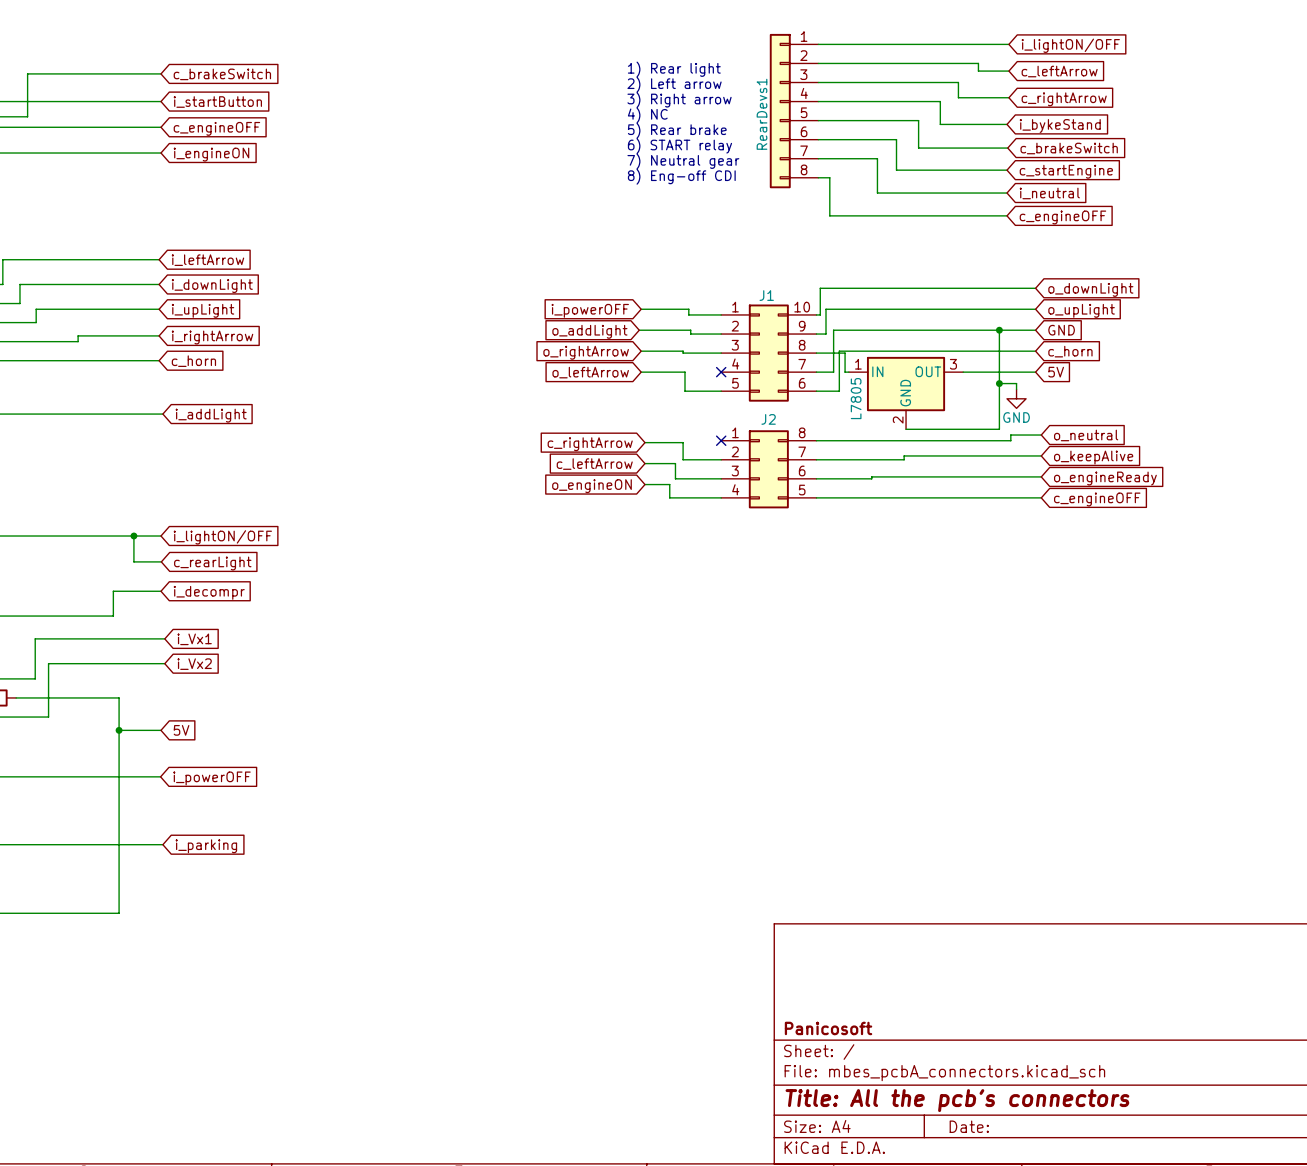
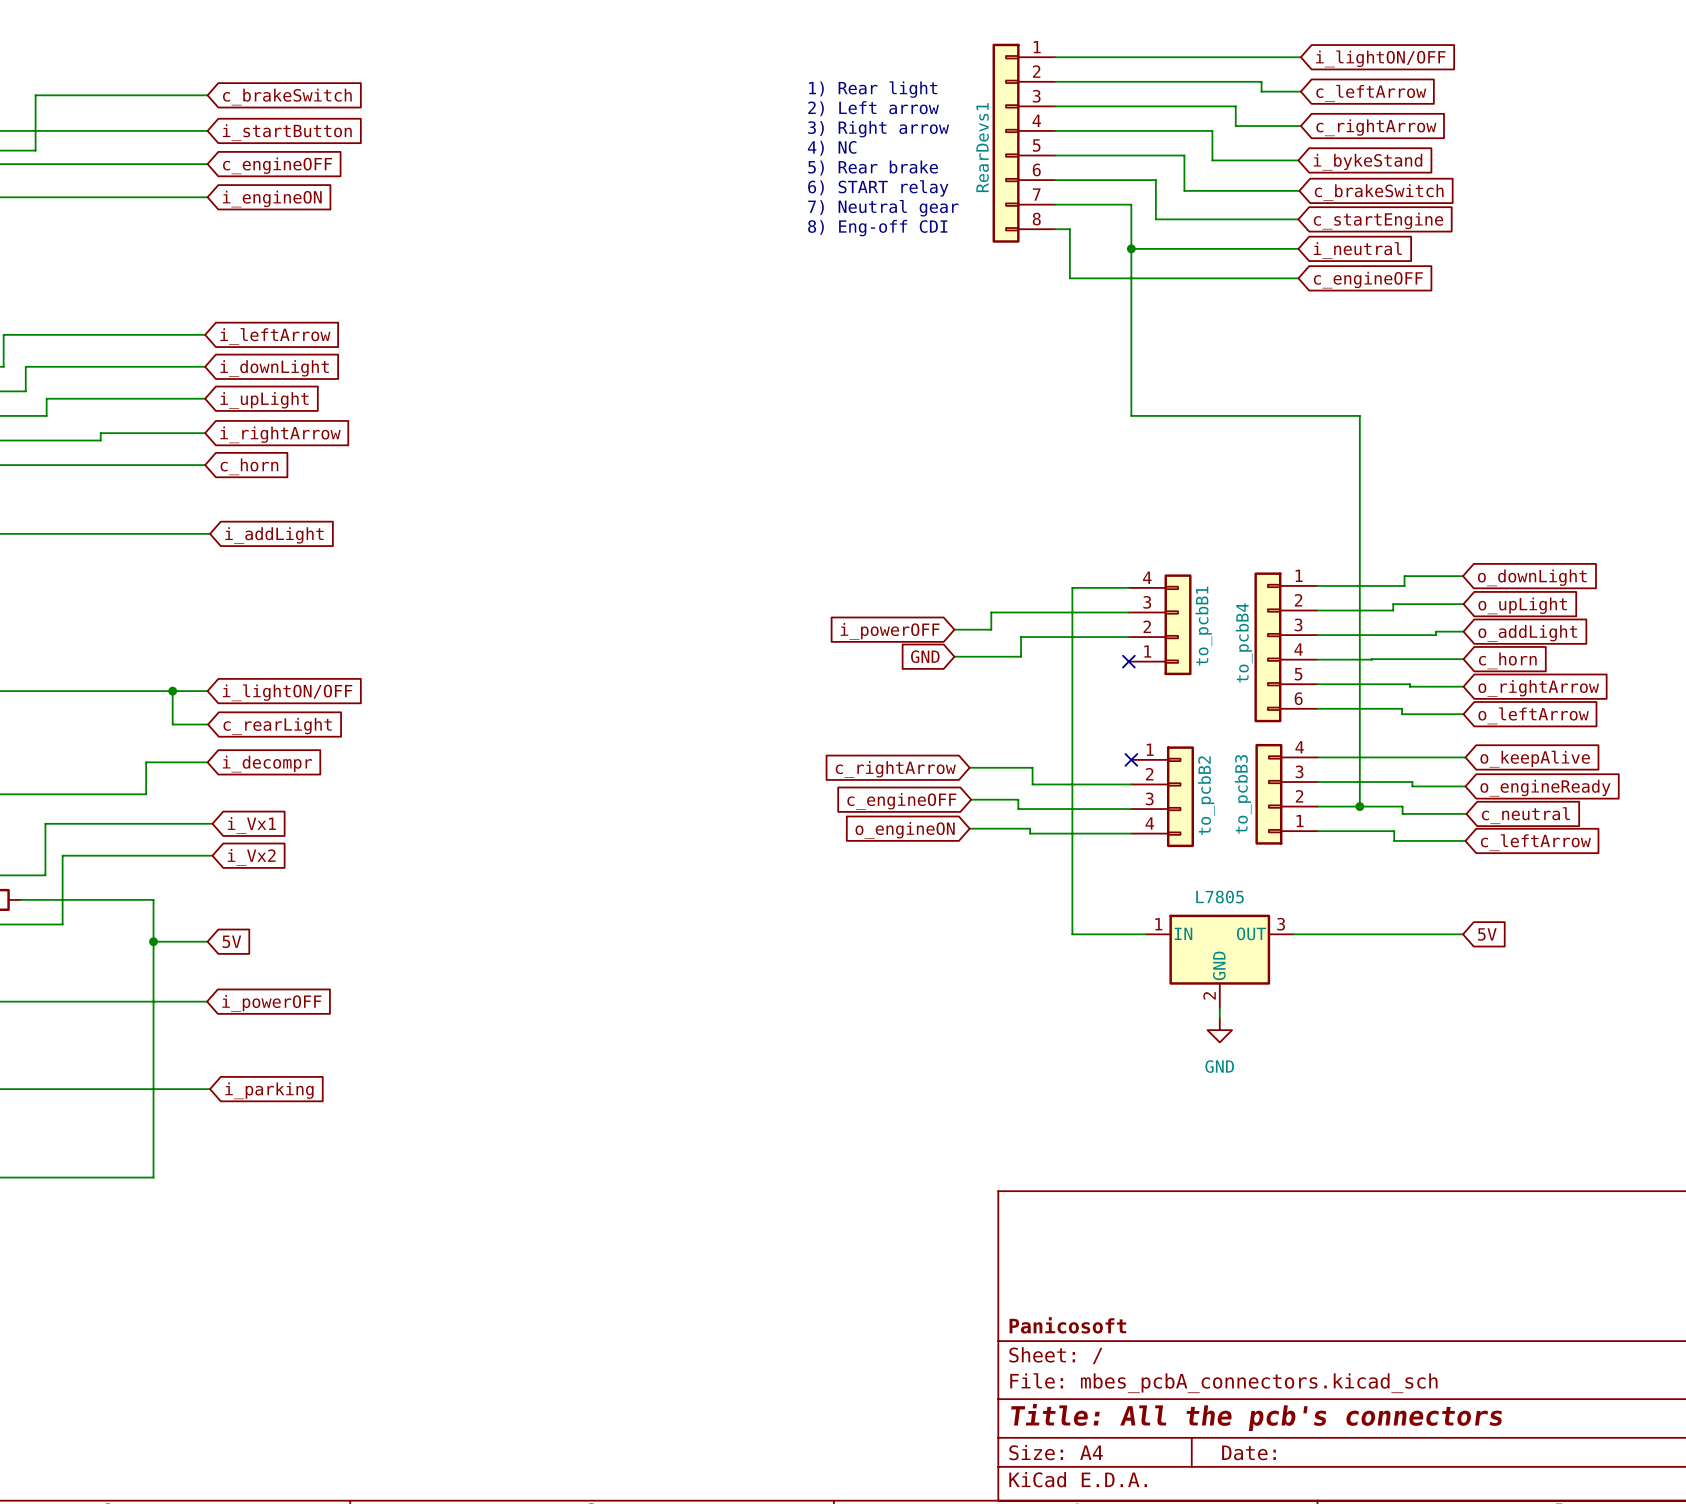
wire: none -> (1131, 248) (1131, 415) (1359, 415) (1359, 806)
junction: none -> (1131, 248)
wire: (1035, 288) (820, 288) (820, 314) (816, 314) -> none
global label position: o_downLight (1090, 289) -> o_downLight (1532, 577)
wire: (641, 309) (688, 309) (688, 314) (721, 314) -> none
wire: (1035, 309) (826, 309) (826, 334) (816, 334) -> none
global label: i_powerOFF (590, 310) -> none
global label: o_upLight (1081, 310) -> none
wire: (639, 330) (690, 330) (690, 334) (721, 334) -> none
wire: (999, 330) (999, 429) (906, 429) -> none
junction: (999, 330) -> none
wire: (1035, 330) (833, 330) (833, 372) (816, 372) -> none
global label: GND (1061, 330) -> none
global label: o_addLight (589, 331) -> none
wire: (641, 351) (721, 353) -> none
wire: (1035, 351) (839, 351) (839, 391) (816, 391) -> none
global label: c_horn (1070, 351) -> none
global label: o_rightArrow (586, 352) -> none
J1: (768, 353) -> none
wire: (816, 353) (845, 353) (845, 372) (848, 372) -> none
global label: o_leftArrow (590, 372) -> none
wire: (641, 372) (684, 372) (684, 391) (721, 391) -> none
no-connect mark: (721, 372) -> none
wire: (963, 372) (1035, 372) -> none
global label: 5V (1056, 372) -> none
wire: (999, 383) (1016, 383) (1016, 389) -> none
junction: (999, 383) -> none
part: L7805 (906, 393) -> none
power symbol: GND (1016, 398) -> none
wire: (1041, 435) (1010, 435) (1010, 440) (816, 440) -> none
global label: o_neutral (1086, 435) -> none
no-connect mark: (721, 440) -> none
wire: (644, 442) (683, 442) (683, 459) (721, 459) -> none
global label position: c_rightArrow (590, 444) -> c_rightArrow (895, 769)
wire: none -> (1463, 576) (1404, 576) (1404, 585) (1317, 585)
wire: none -> (1128, 587) (1072, 587) (1072, 934) (1146, 934)
wire: (1041, 455) (904, 455) (904, 459) (816, 459) -> none
global label position: o_keepAlive (1093, 457) -> o_keepAlive (1535, 759)
wire: (644, 463) (675, 463) (675, 478) (721, 478) -> none
global label: c_leftArrow (594, 464) -> none
wire: none -> (1463, 604) (1393, 604) (1393, 610) (1317, 610)
J2: (768, 469) -> none
global label: none -> o_upLight (1522, 605)
wire: none -> (1128, 612) (991, 612) (991, 629) (954, 629)
wire: (1041, 476) (816, 478) -> none
global label position: o_engineReady (1105, 478) -> o_engineReady (1545, 788)
wire: (644, 484) (669, 484) (669, 497) (721, 497) -> none
to_pcbB1: none -> (1160, 624)
global label: o_engineON (592, 486) -> none
global label: none -> i_powerOFF (890, 631)
wire: none -> (1463, 631) (1435, 631) (1435, 635) (1317, 635)
global label: none -> o_addLight (1527, 633)
wire: none -> (1128, 637) (1021, 637) (1021, 656) (954, 656)
wire: (816, 497) (1041, 497) -> none
global label: c_engineOFF (1097, 499) -> none
to_pcbB4: none -> (1285, 647)
global label: none -> GND (925, 656)
wire: none -> (1463, 659) (1317, 659)
global label: none -> c_horn (1507, 660)
no-connect mark: none -> (1128, 661)
wire: none -> (1317, 684) (1409, 684) (1409, 686) (1463, 686)
global label: none -> o_rightArrow (1538, 688)
wire: none -> (1317, 708) (1402, 708) (1402, 714) (1463, 714)
global label: none -> o_leftArrow (1533, 715)
wire: none -> (1318, 757) (1465, 757)
no-connect mark: none -> (1131, 759)
wire: none -> (969, 767) (1032, 767) (1032, 784) (1131, 784)
wire: none -> (1318, 782) (1412, 782) (1412, 786) (1465, 786)
to_pcbB3: none -> (1286, 794)
to_pcbB2: none -> (1162, 796)
wire: none -> (971, 799) (1018, 799) (1018, 809) (1131, 809)
global label: none -> c_engineOFF (901, 801)
wire: none -> (1318, 806) (1402, 806) (1402, 813) (1466, 813)
junction: none -> (1359, 806)
global label: none -> c_neutral (1525, 815)
wire: none -> (969, 828) (1030, 828) (1030, 833) (1131, 833)
global label: none -> o_engineON (905, 830)
wire: none -> (1318, 831) (1394, 831) (1394, 840) (1465, 840)
global label: none -> c_leftArrow (1535, 842)
wire: none -> (1293, 934) (1463, 934)
global label: none -> 5V (1487, 934)
part: none -> L7805 (1219, 961)
wire: none -> (1219, 1008) (1219, 1017)
power symbol: none -> GND (1219, 1030)

